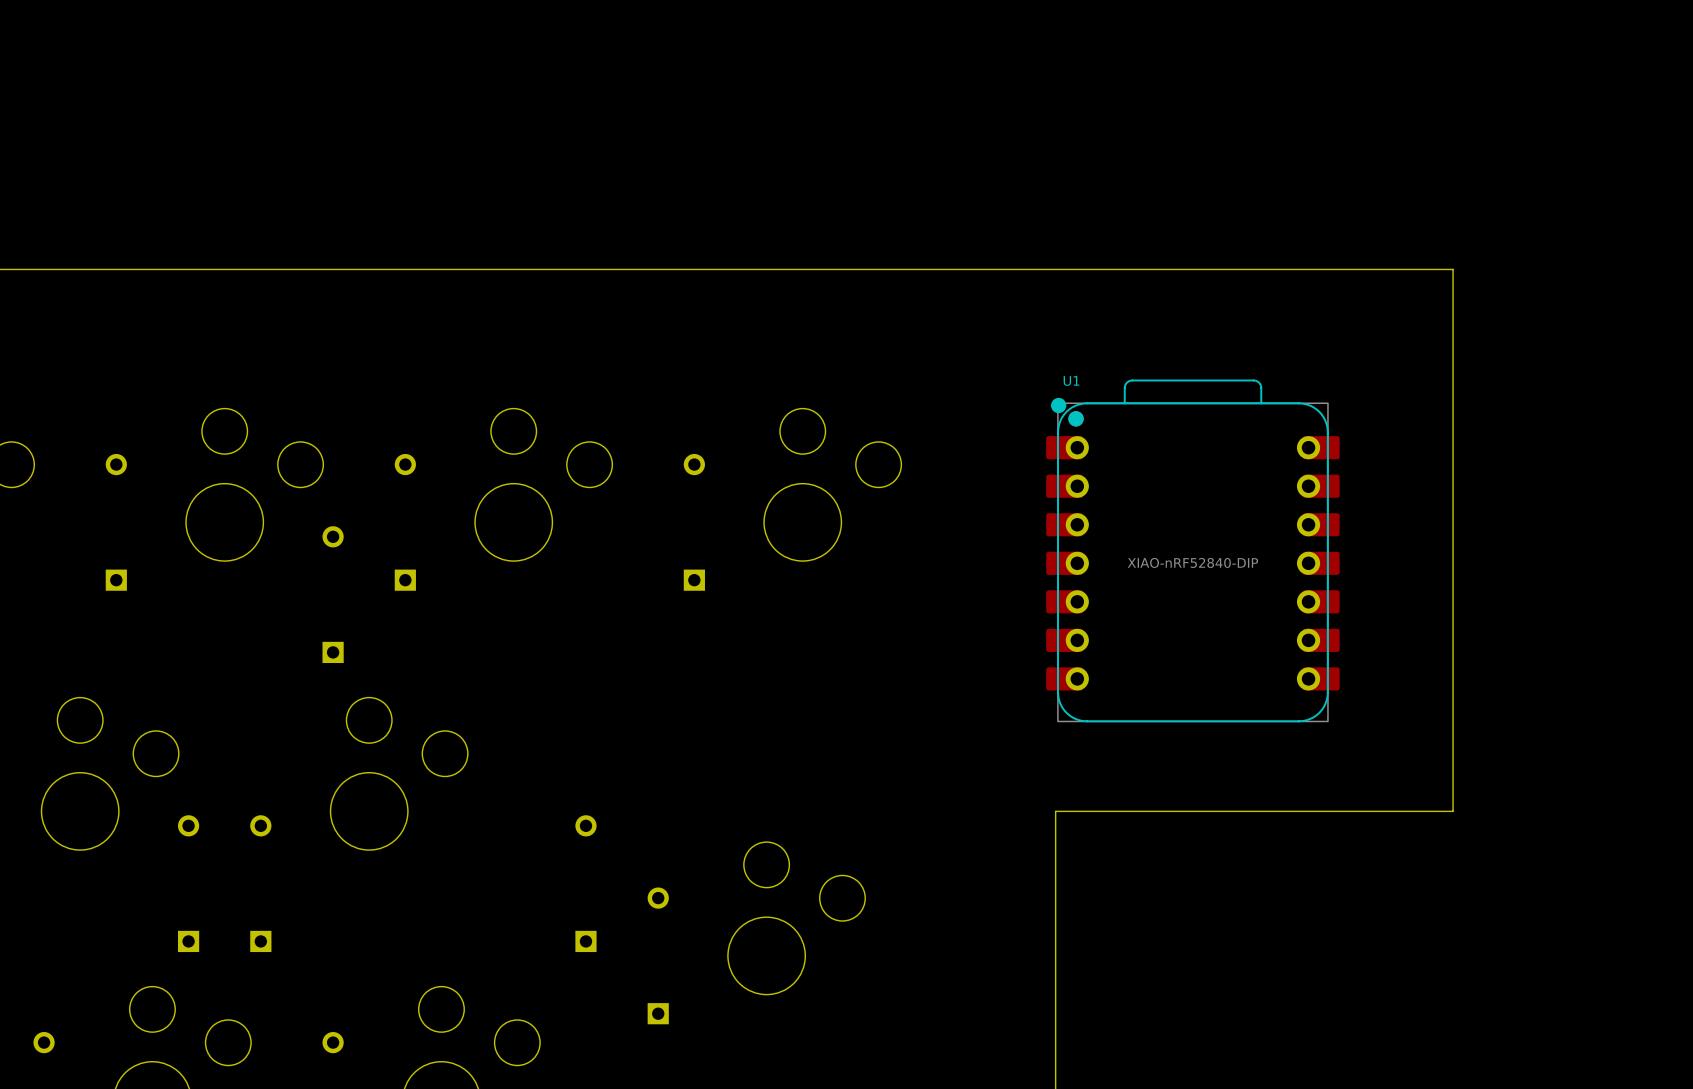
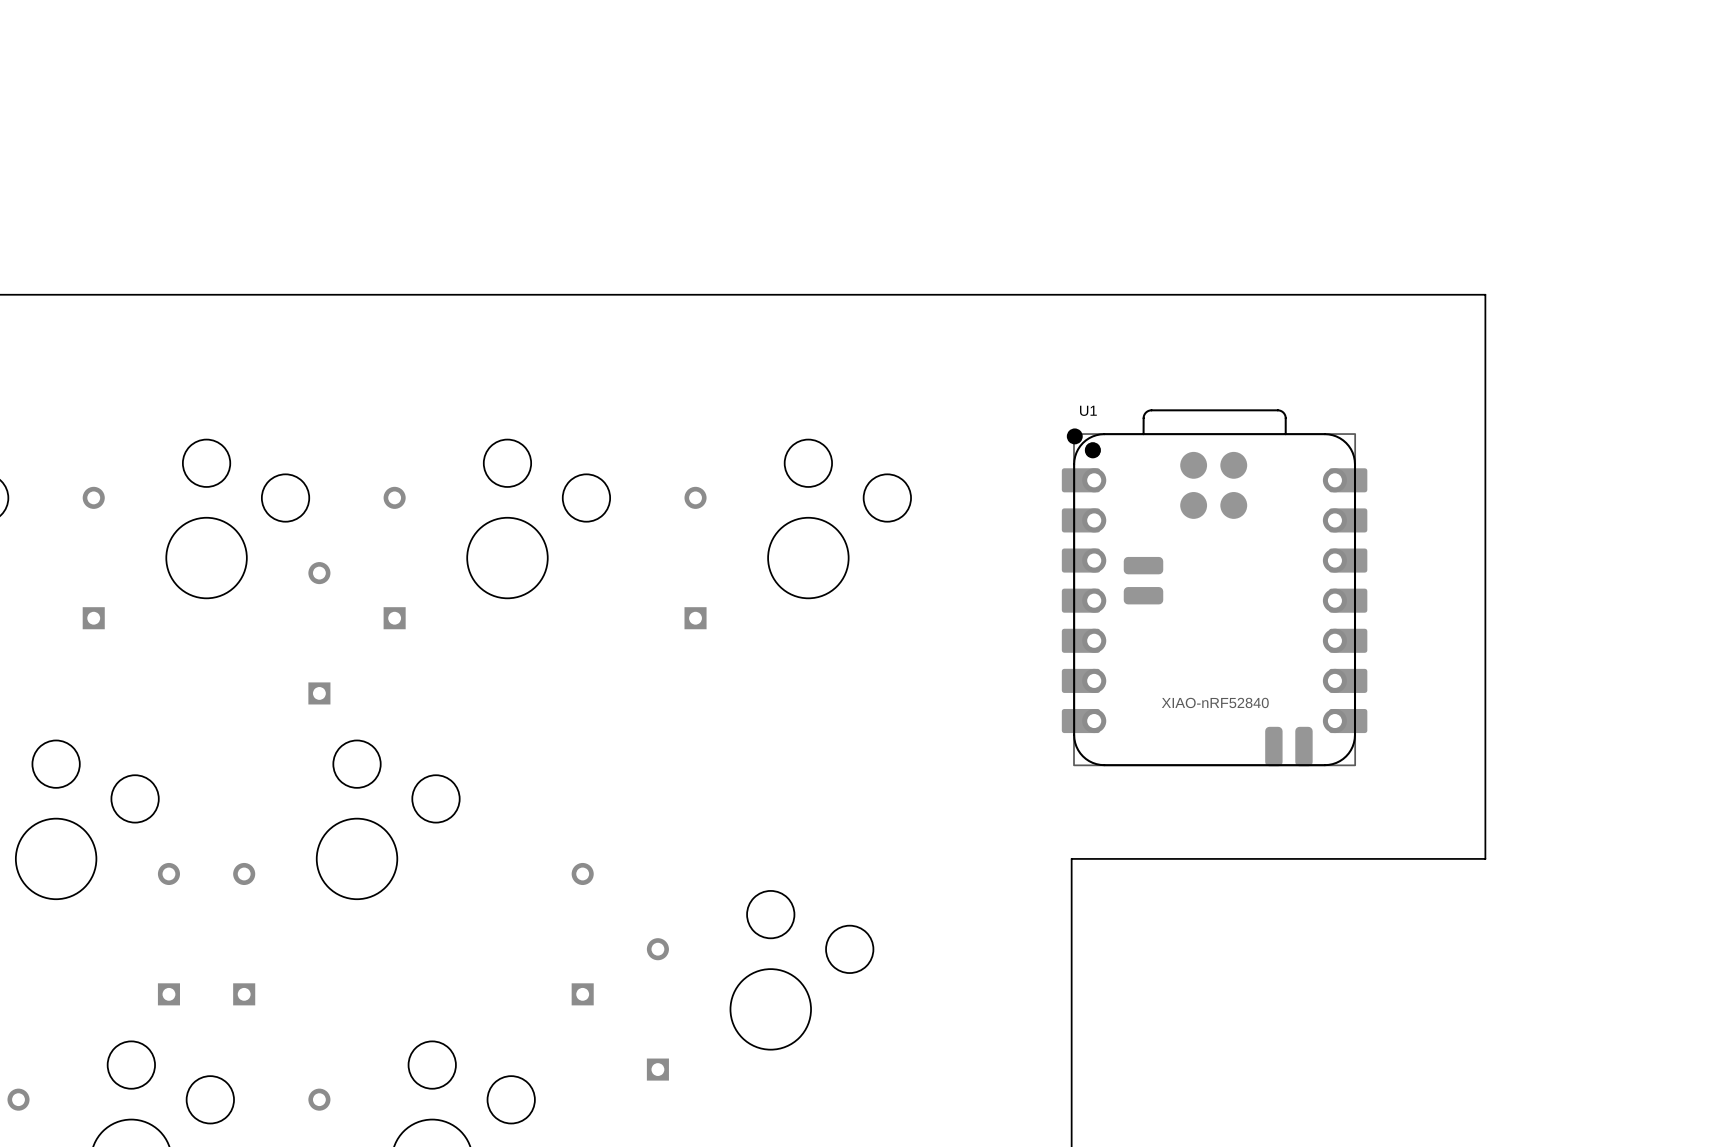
U1 footprint: [1046, 379, 1340, 723] -> [1061, 409, 1368, 767]
U1 value: XIAO-nRF52840-DIP (1192, 562) -> XIAO-nRF52840 (1215, 702)

